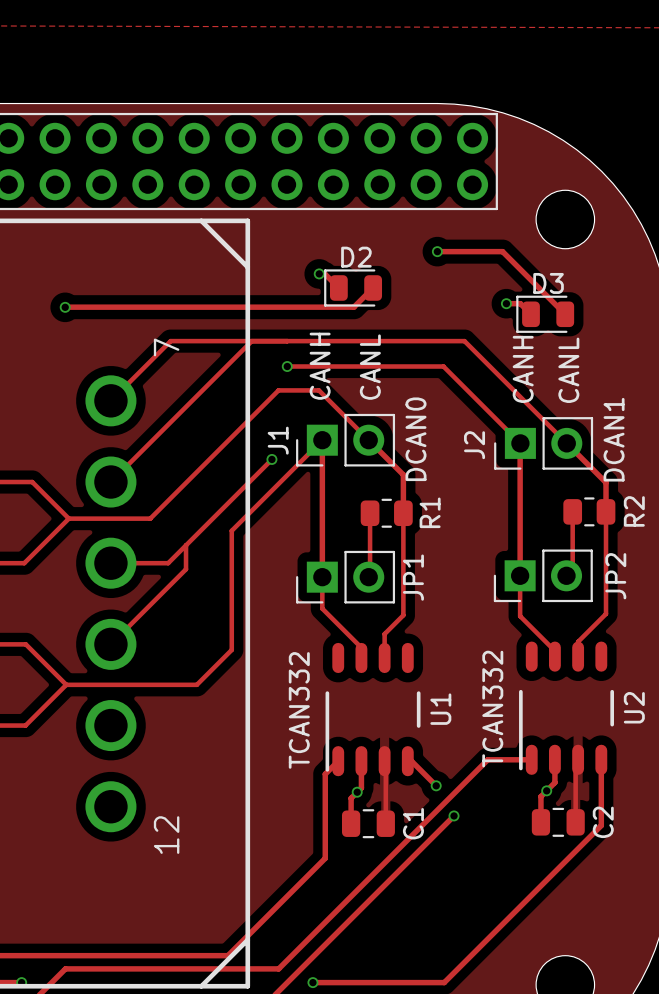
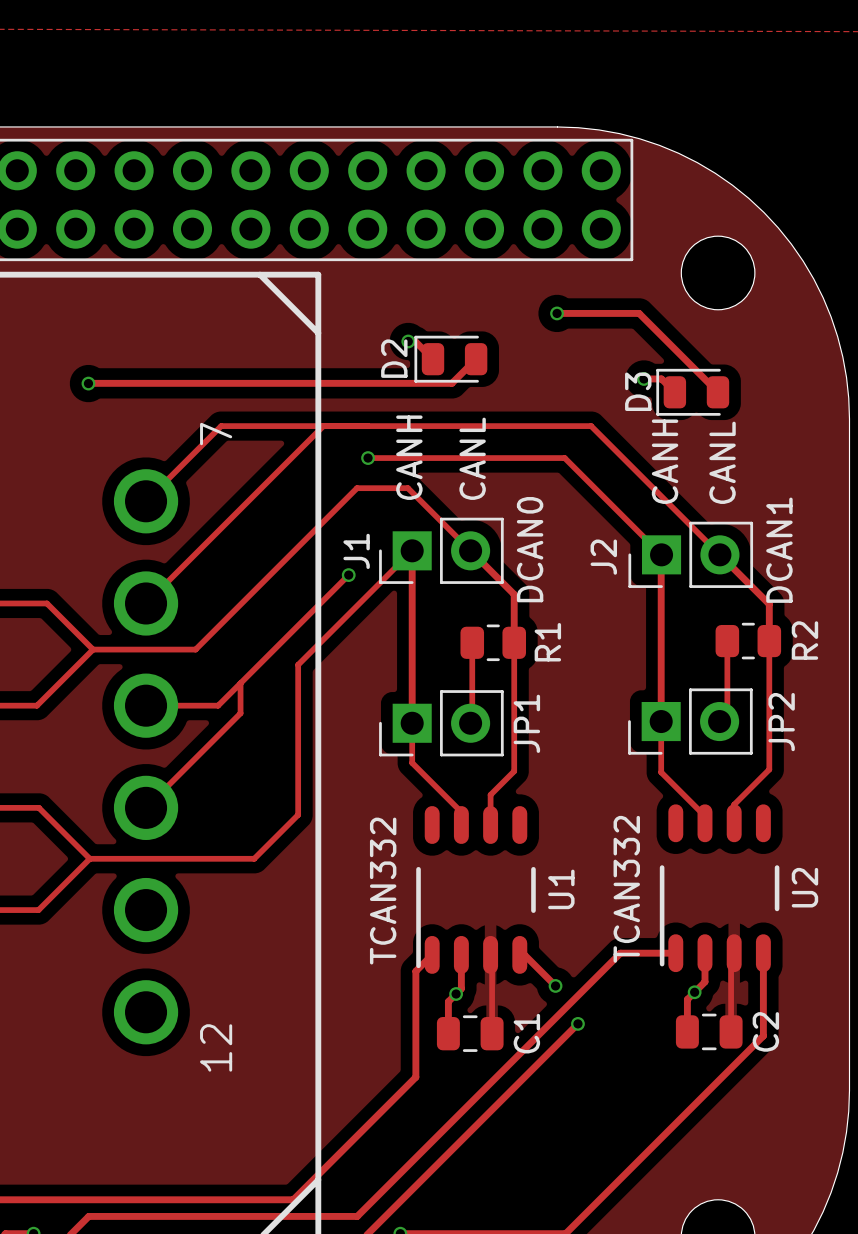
D2 name rotation: 0° (356, 257) -> 90° counterclockwise (394, 358)
D2 name position: D2 (356, 257) -> D2 (394, 358)
D3 name rotation: 0° (548, 283) -> 90° counterclockwise (638, 391)
D3 name position: D3 (548, 283) -> D3 (638, 391)

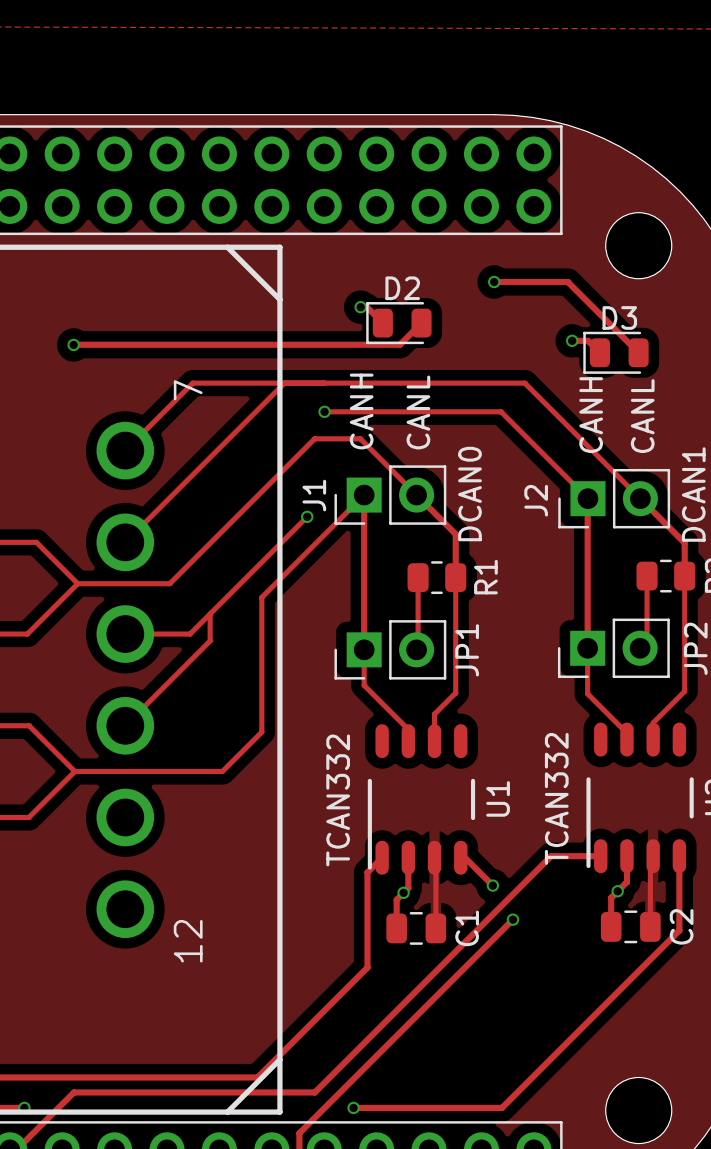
D2 name rotation: 0° (394, 358) -> 90° clockwise (402, 288)
D2 name position: D2 (394, 358) -> D2 (402, 288)
D3 name rotation: 0° (638, 391) -> 90° clockwise (619, 317)
D3 name position: D3 (638, 391) -> D3 (619, 317)

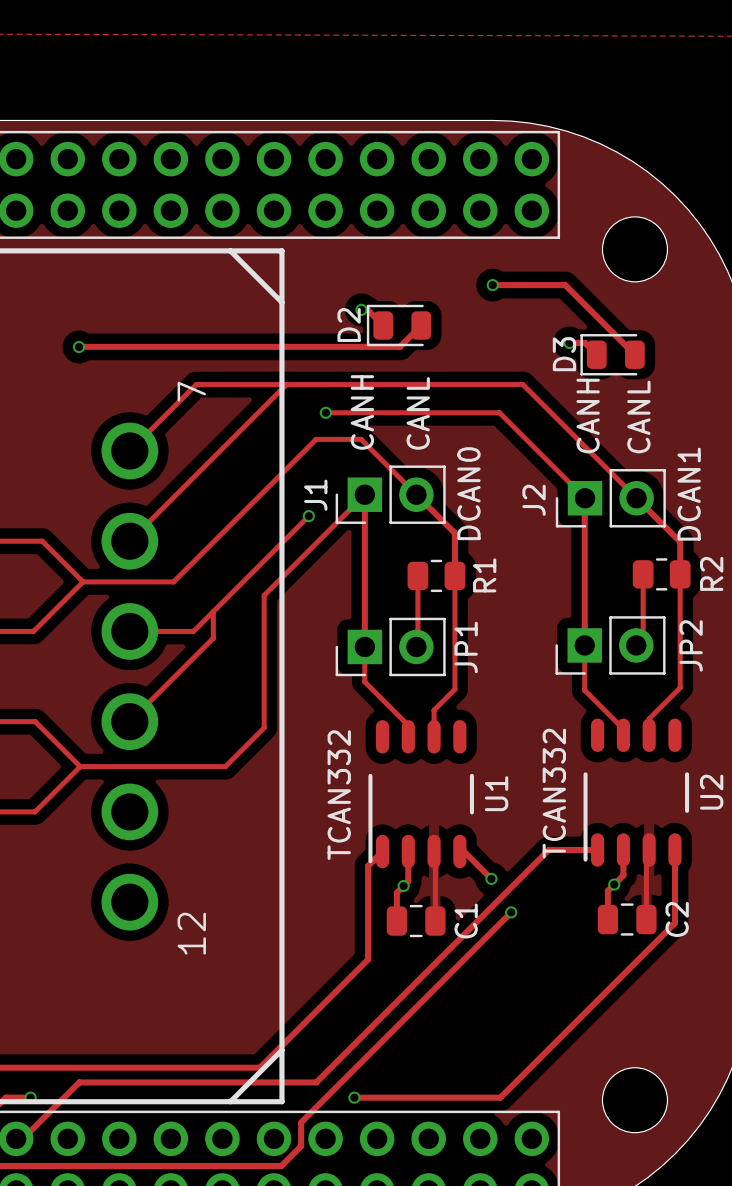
D2 name rotation: 0° (402, 288) -> 90° counterclockwise (349, 325)
D2 name position: D2 (402, 288) -> D2 (349, 325)
D3 name rotation: 0° (619, 317) -> 90° counterclockwise (564, 354)
D3 name position: D3 (619, 317) -> D3 (564, 354)

